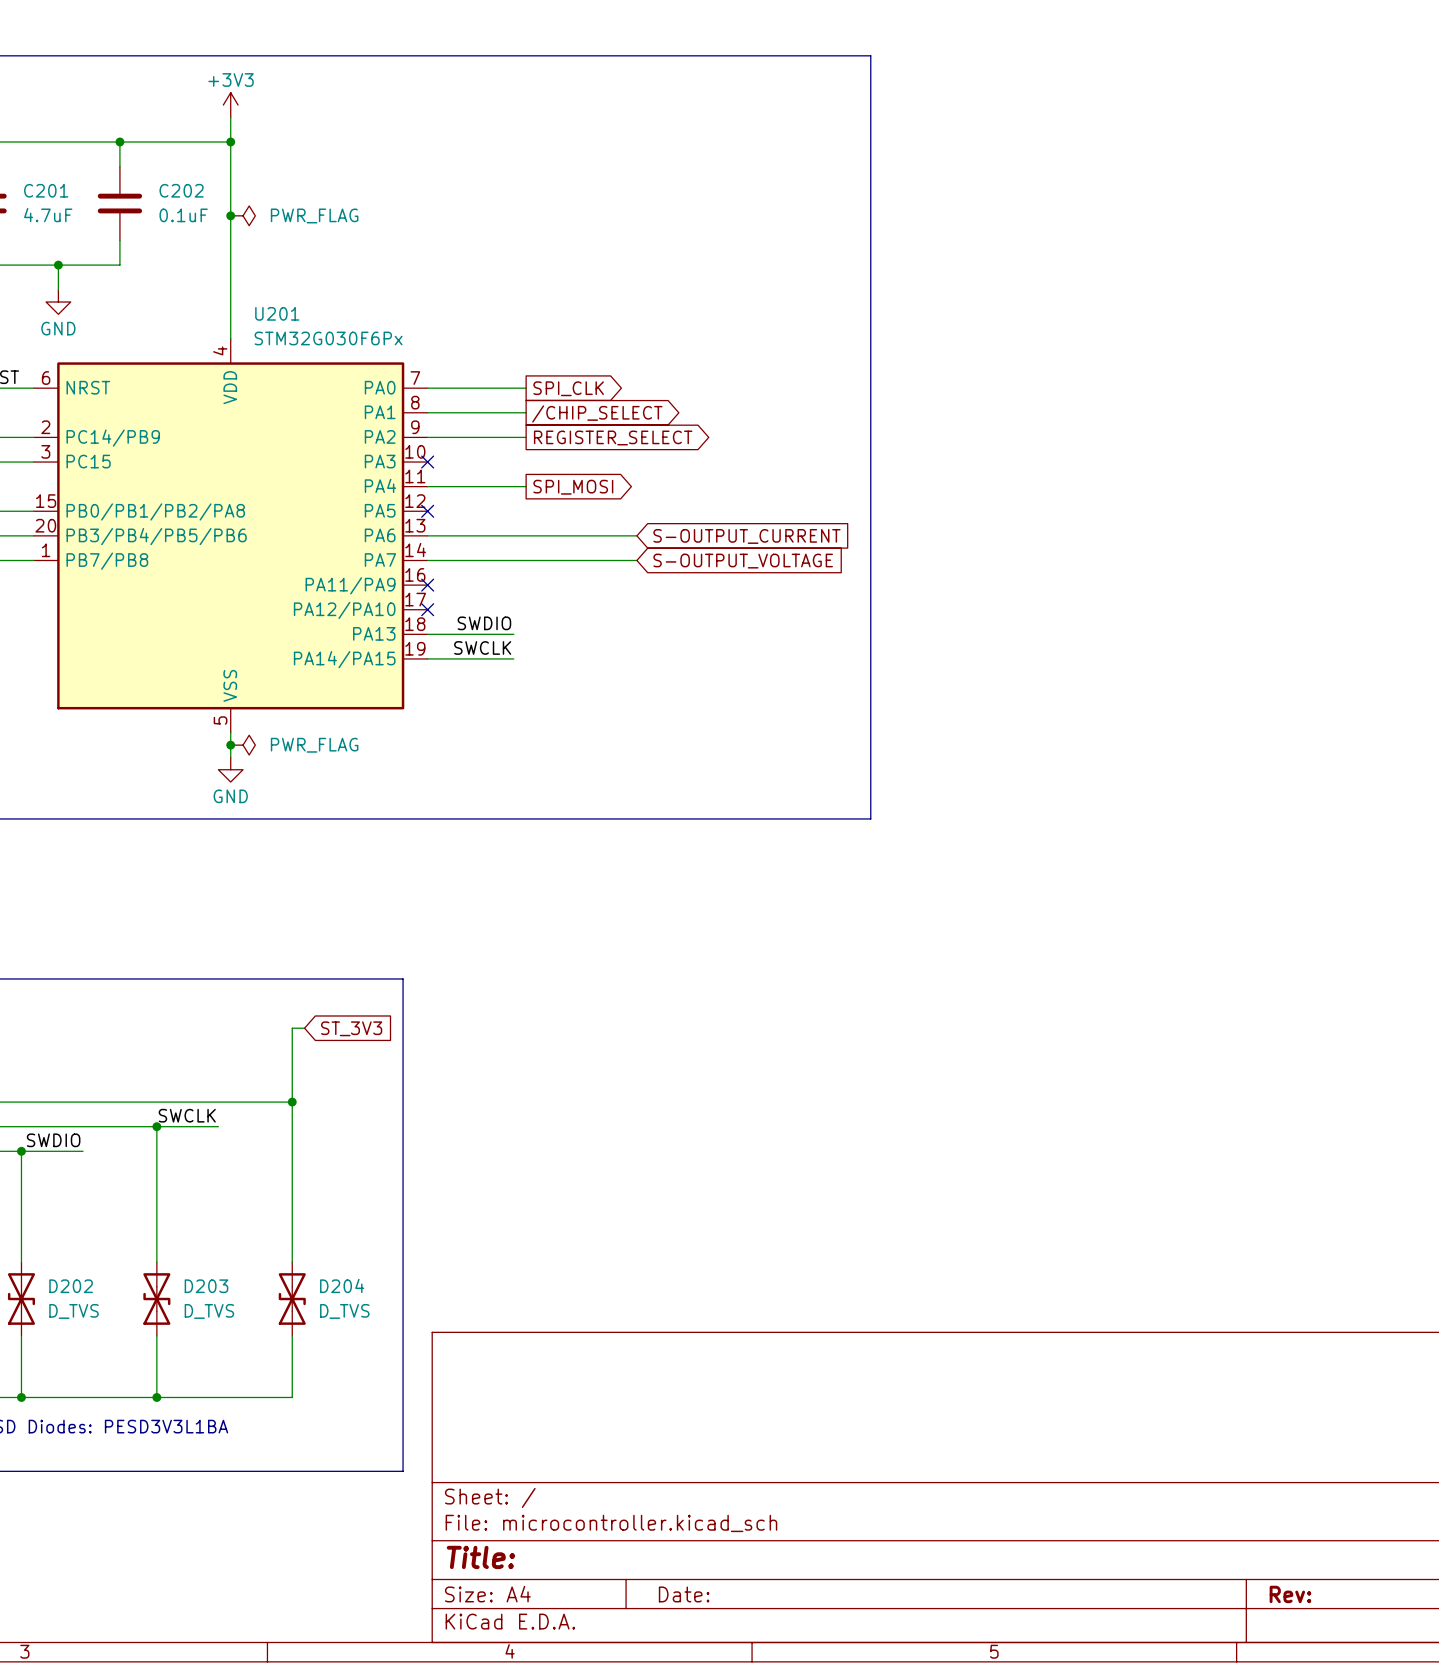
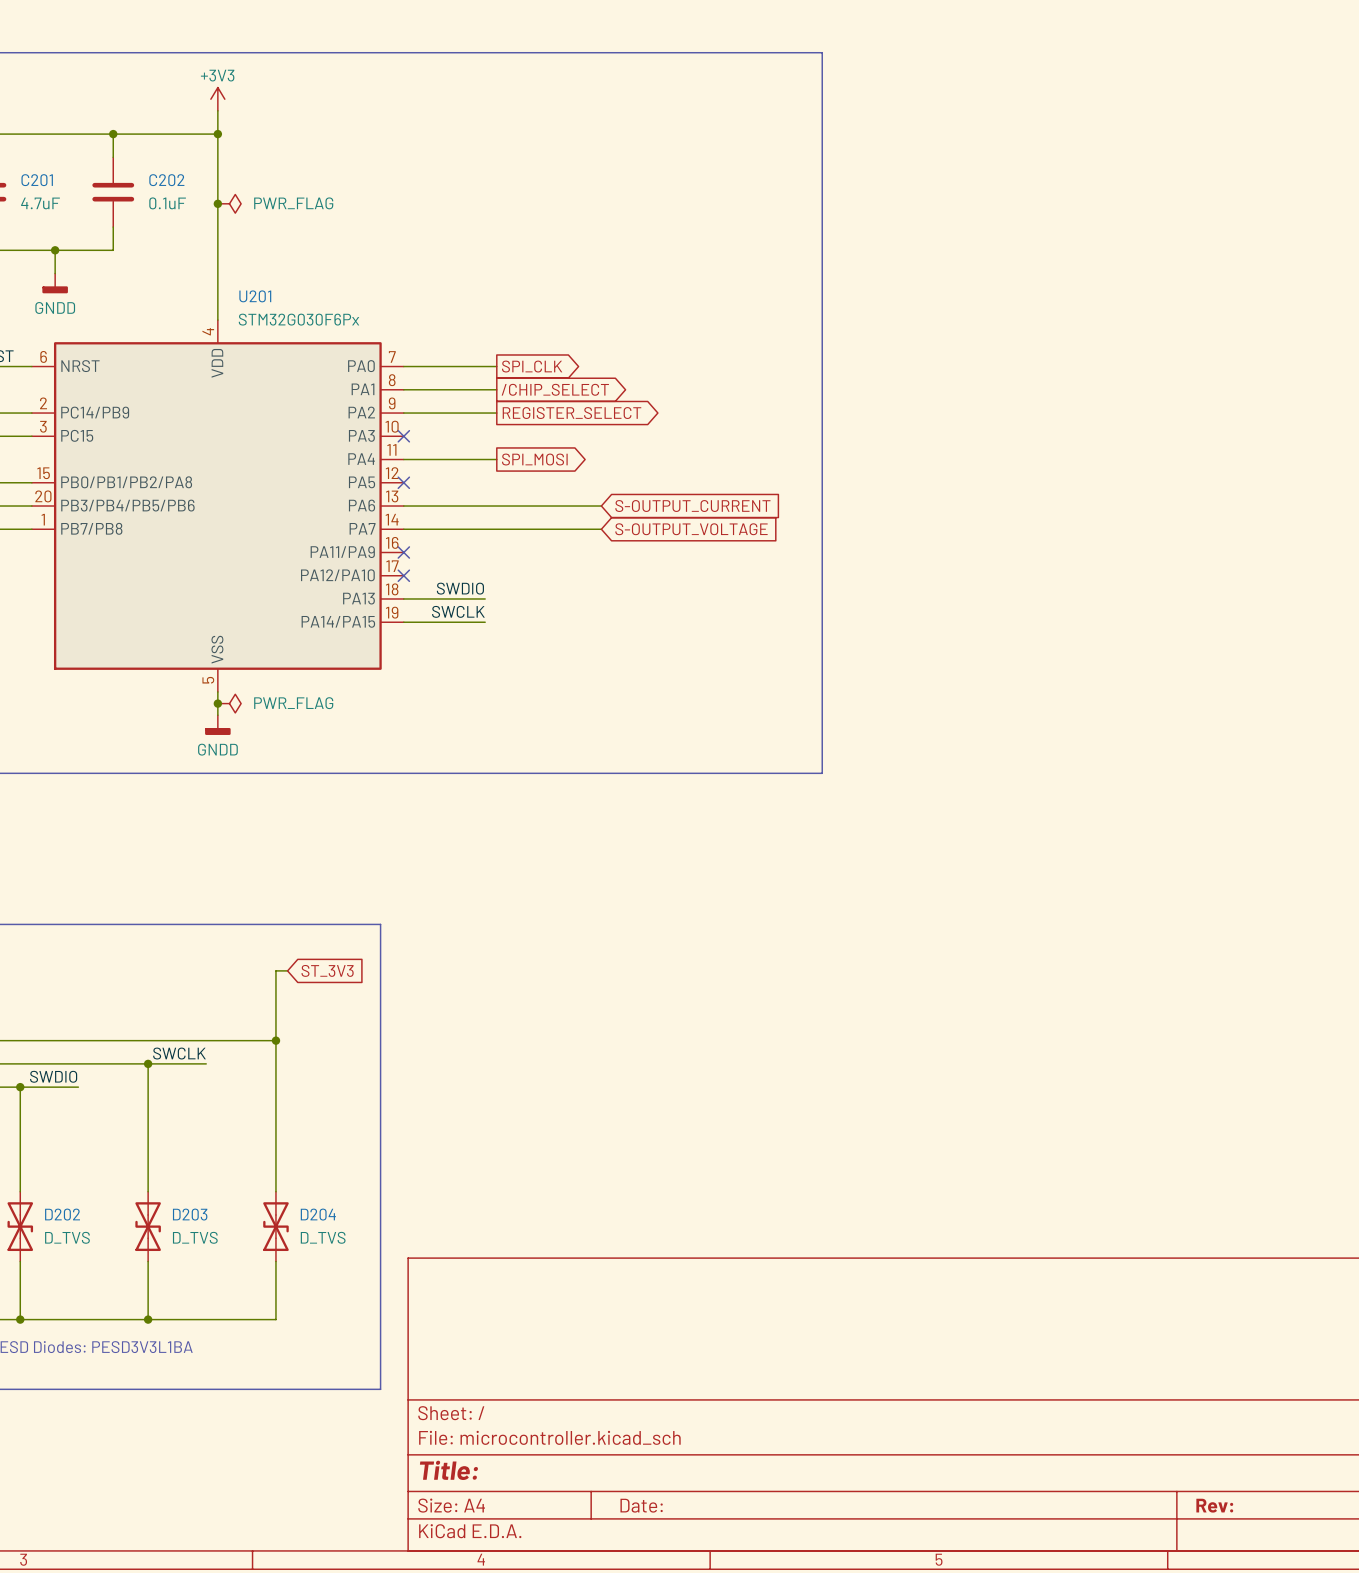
power symbol: GND (58, 302) -> GNDD (55, 283)
power symbol: GND (230, 769) -> GNDD (217, 725)

